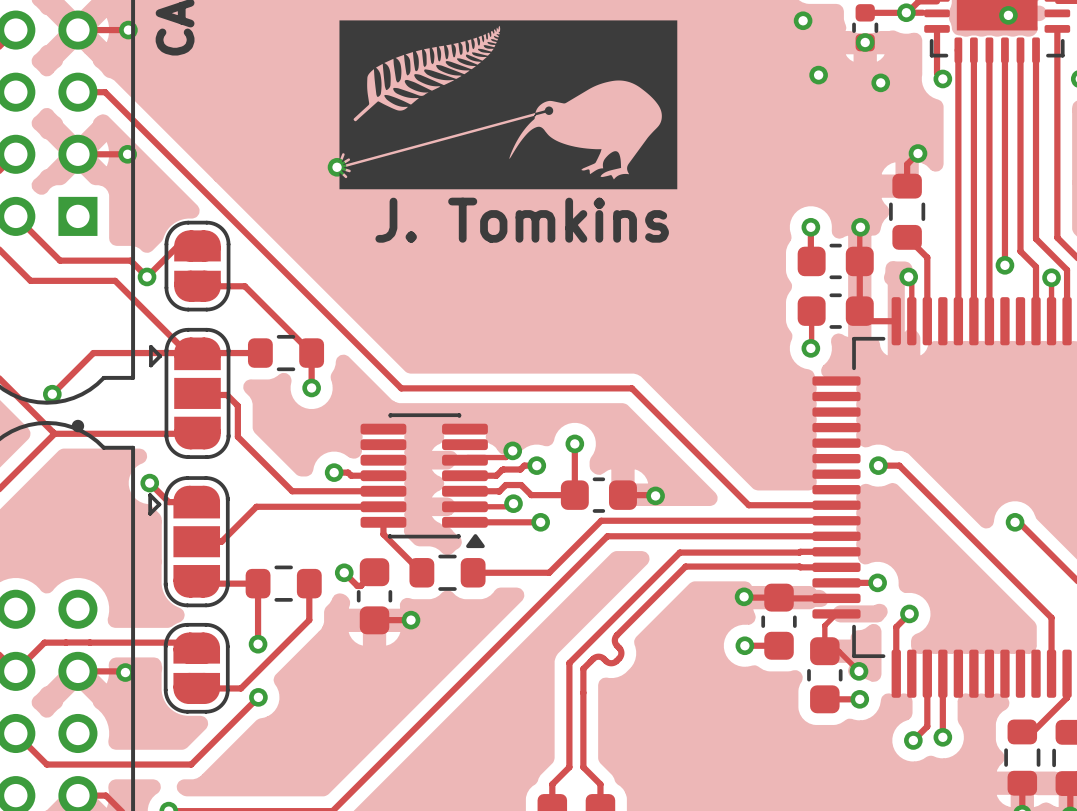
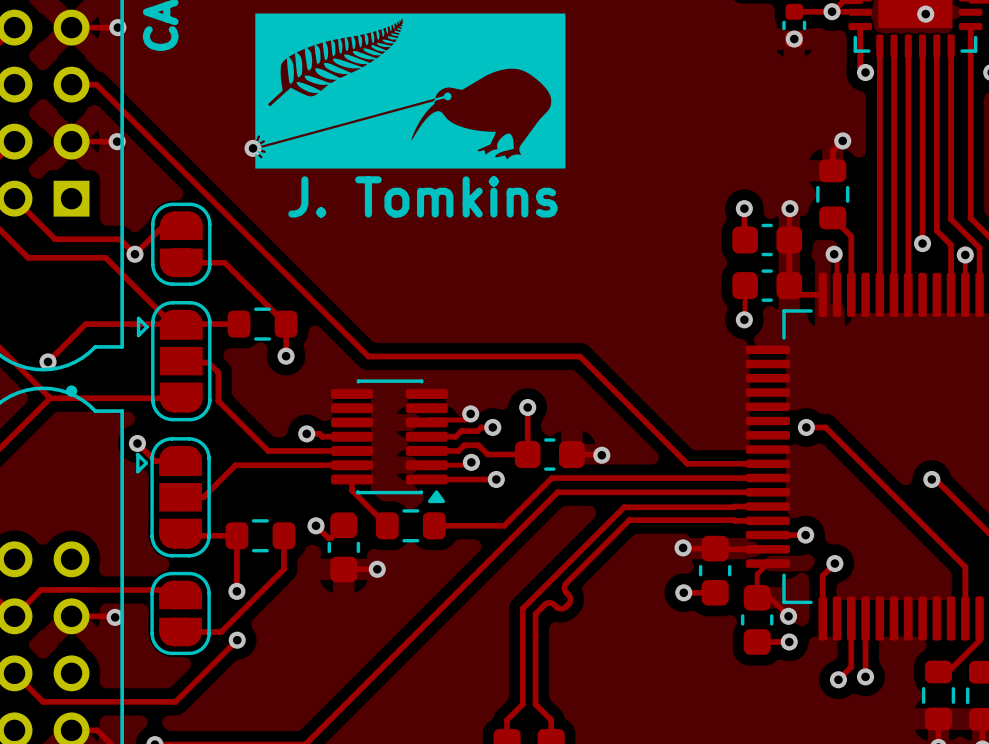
via: (803, 20) -> none
via: (818, 75) -> none
via: (880, 82) -> none
drawing position: (508, 104) -> (410, 91)
drawing position: (649, 161) -> (539, 142)
via position: (337, 167) -> (253, 148)
text position: J. Tomkins (522, 220) -> J. Tomkins (422, 196)

